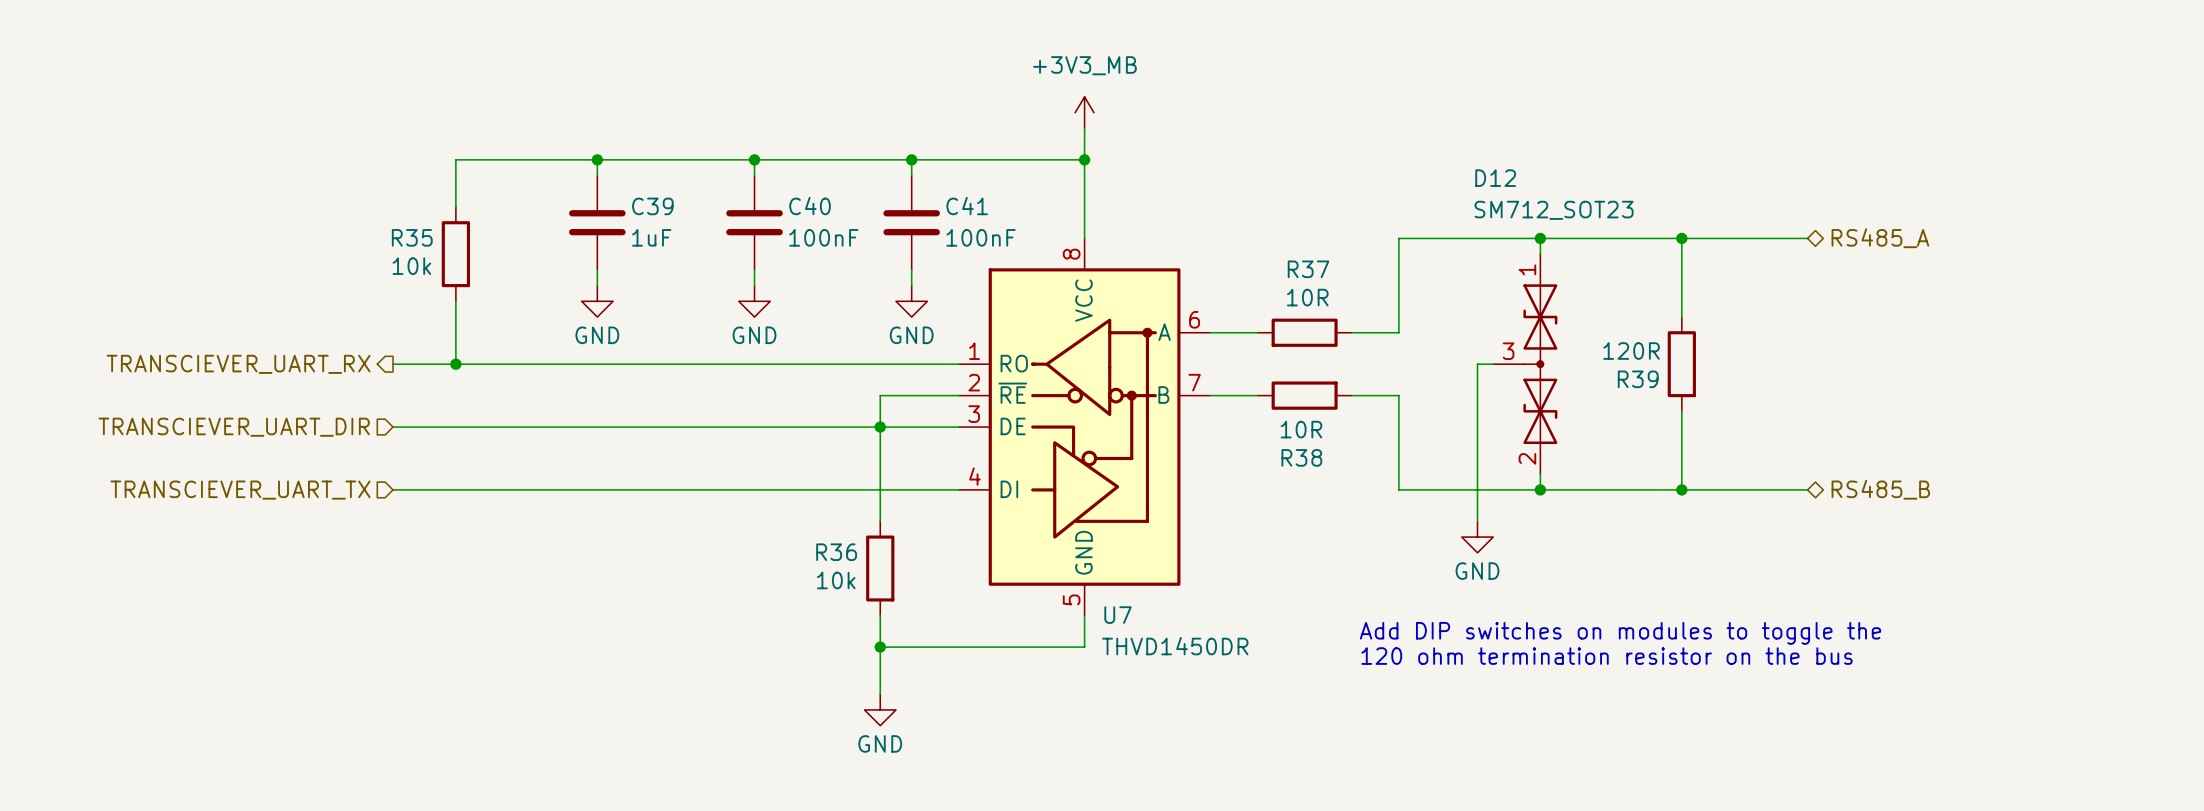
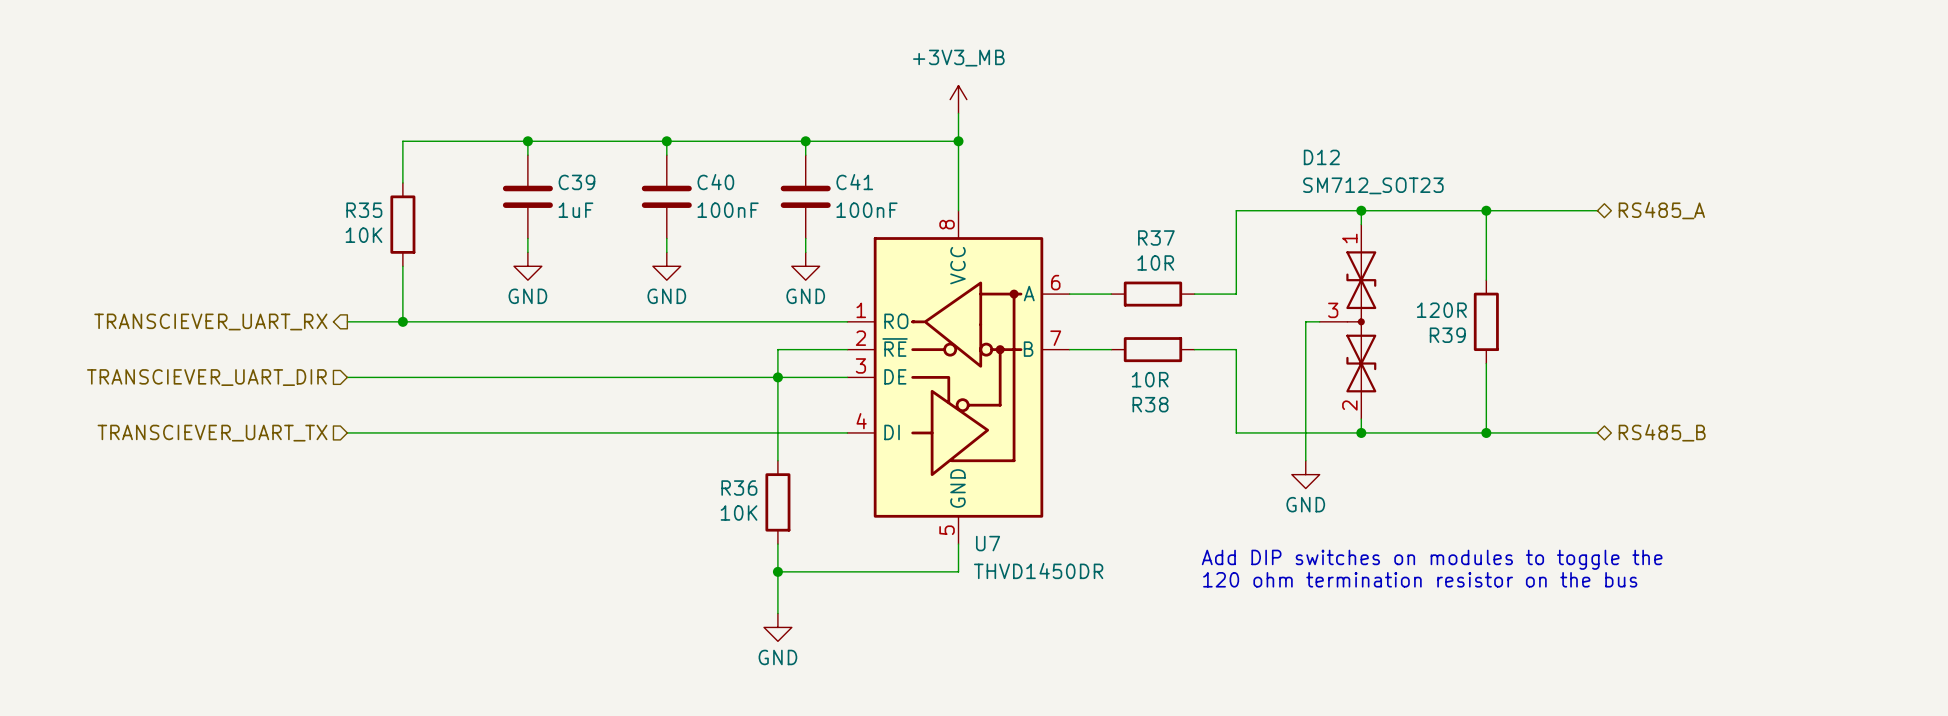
R35 value: 10k (411, 266) -> 10K (364, 235)
R36 value: 10k (836, 580) -> 10K (739, 513)

